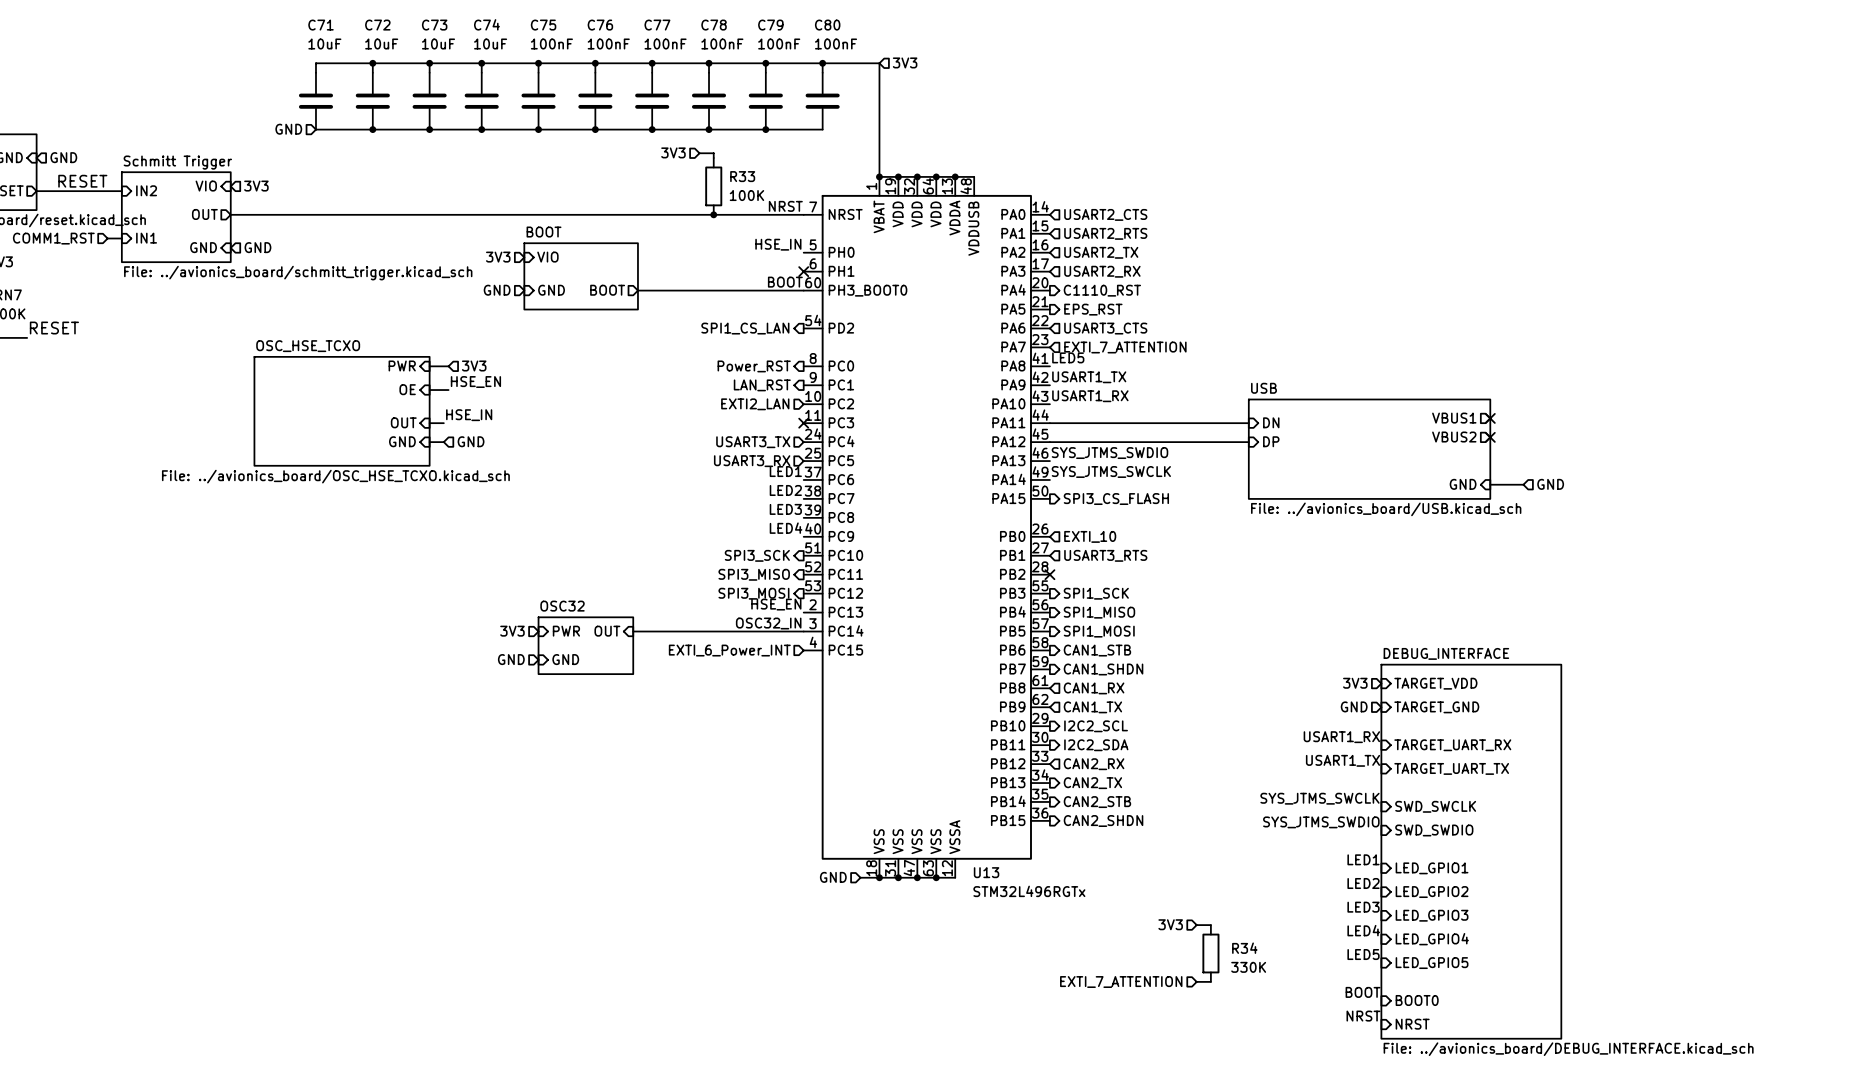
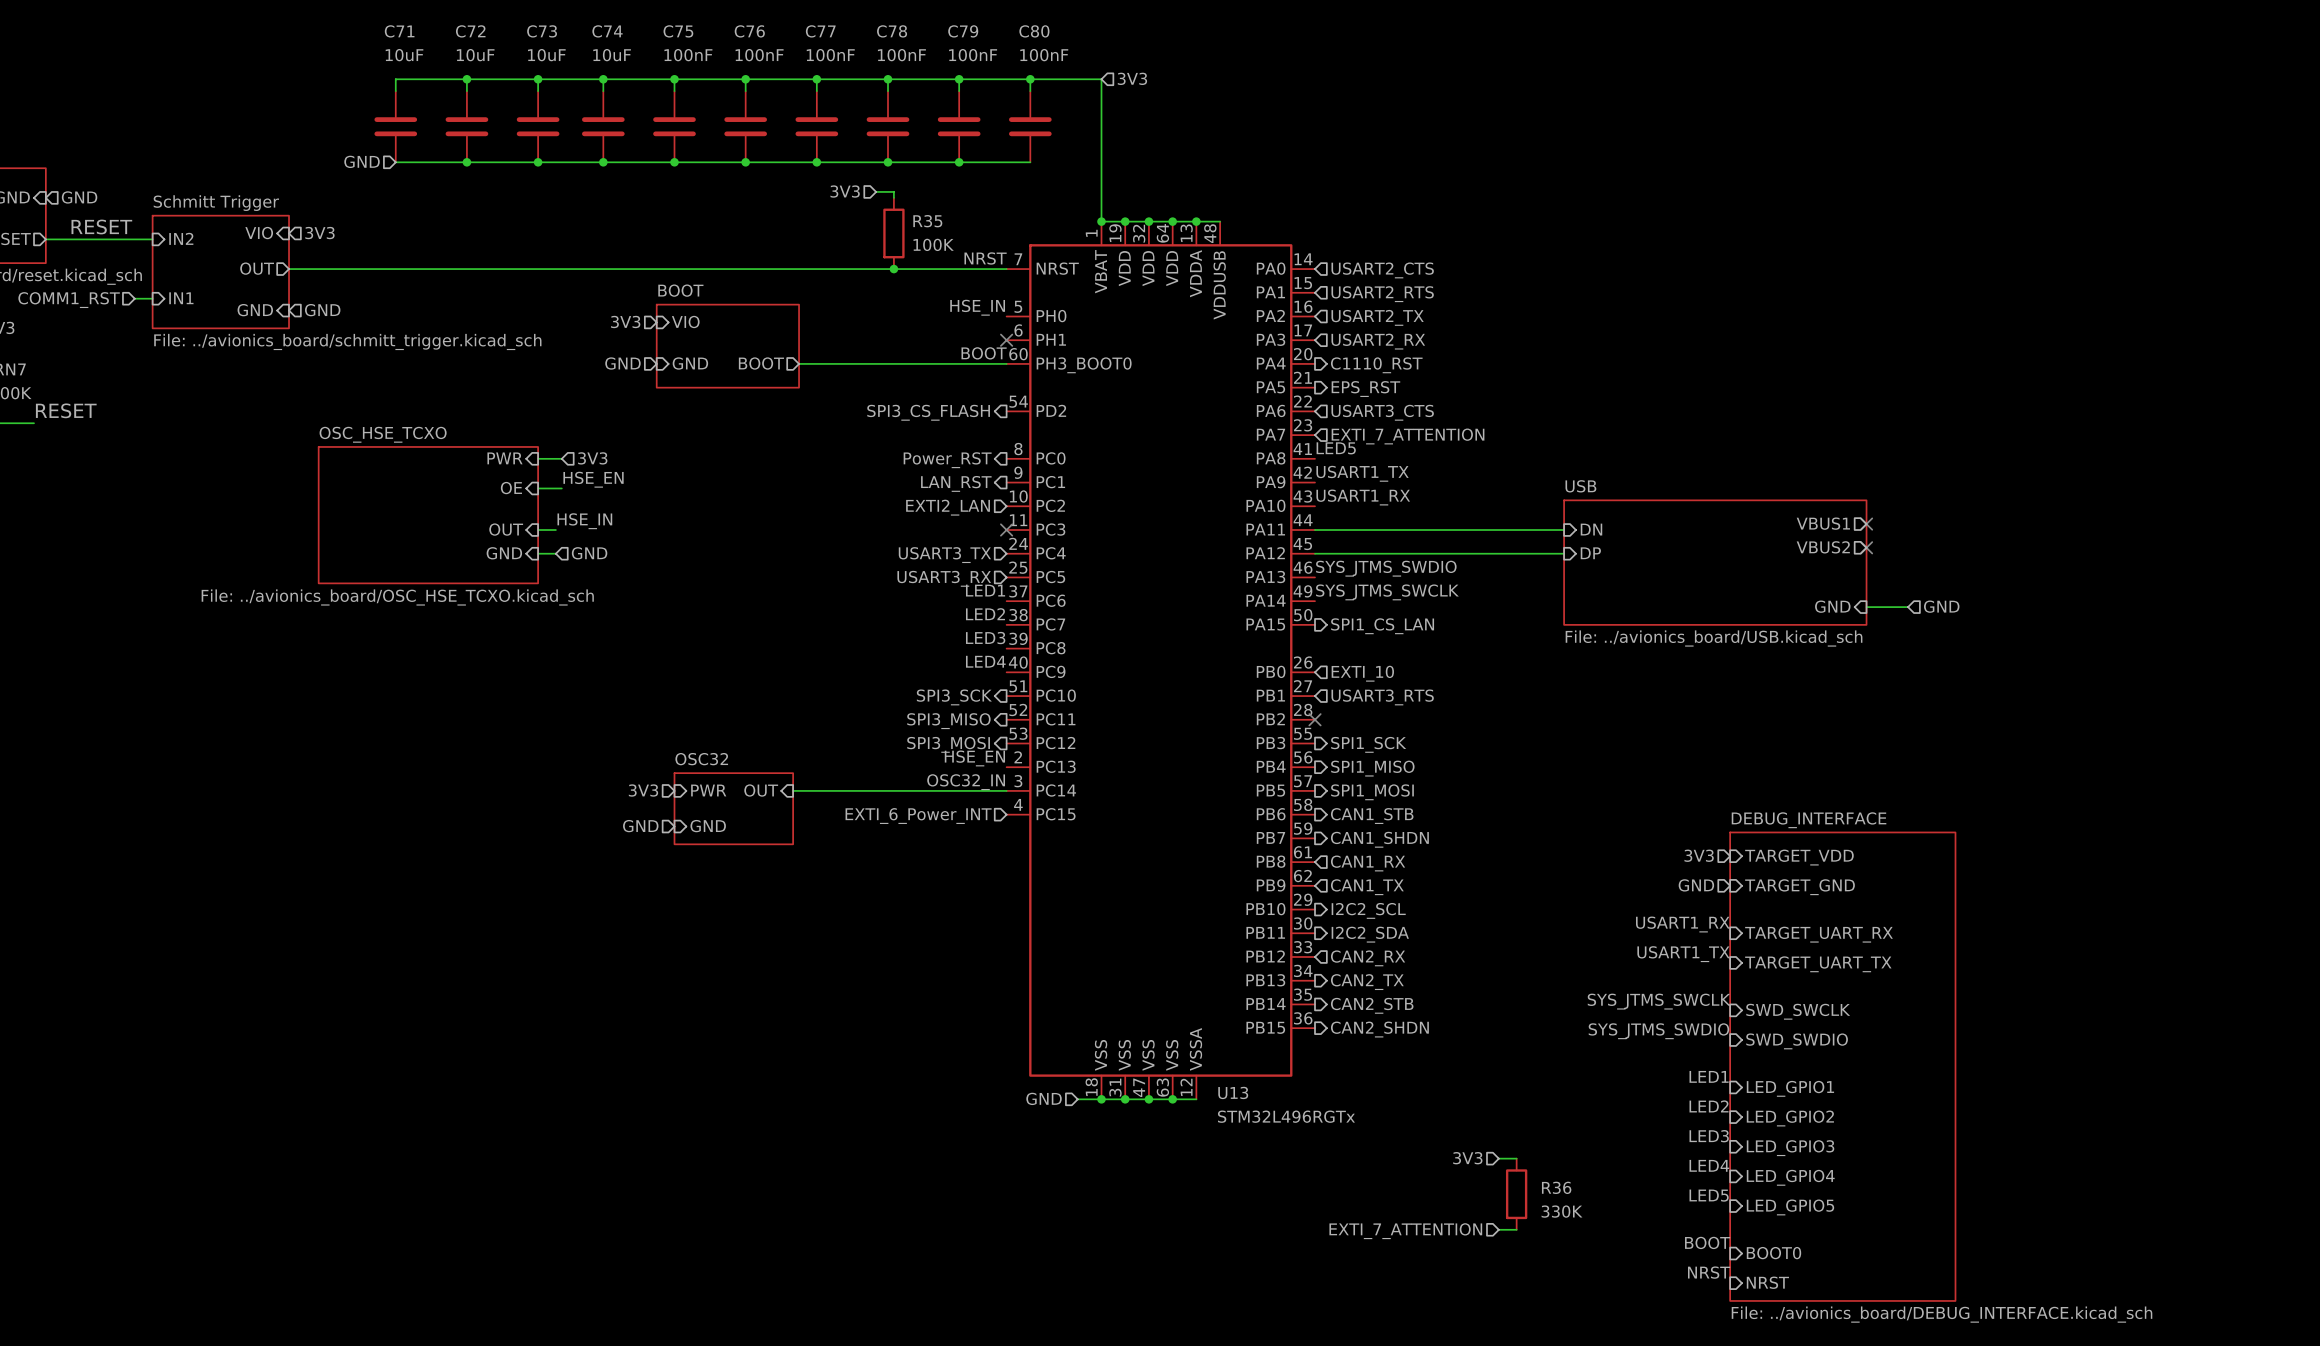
R33 name: R33 (742, 176) -> R35 (927, 221)
hierarchical label: SPI1_CS_LAN (745, 328) -> SPI3_CS_FLASH (928, 412)
hierarchical label: SPI3_CS_FLASH (1116, 499) -> SPI1_CS_LAN (1382, 626)
R34 name: R34 (1244, 948) -> R36 (1556, 1187)

